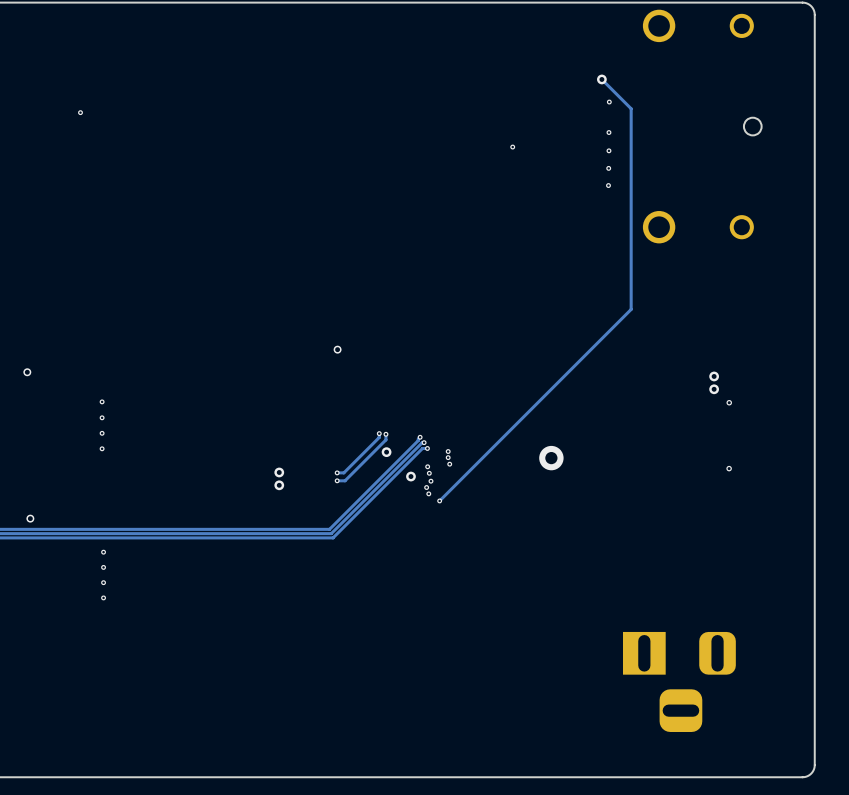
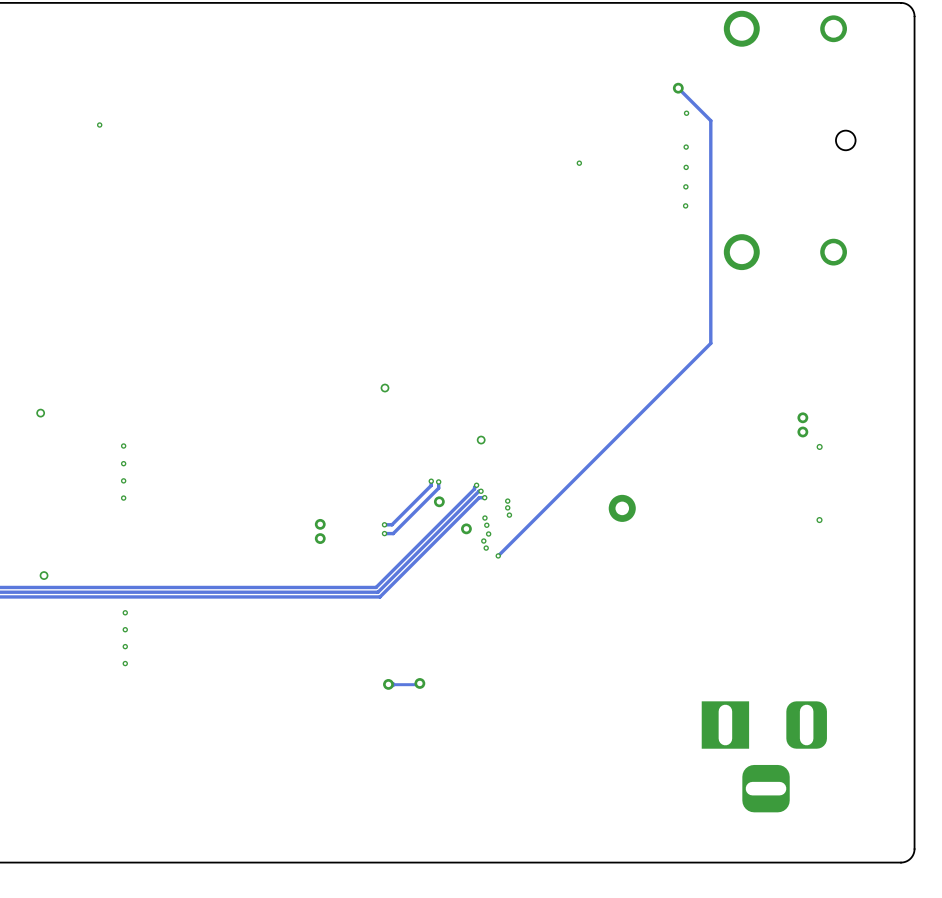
via: none -> (481, 440)
track: none -> (419, 683) (388, 684)
via: none -> (419, 683)
via: none -> (388, 684)

